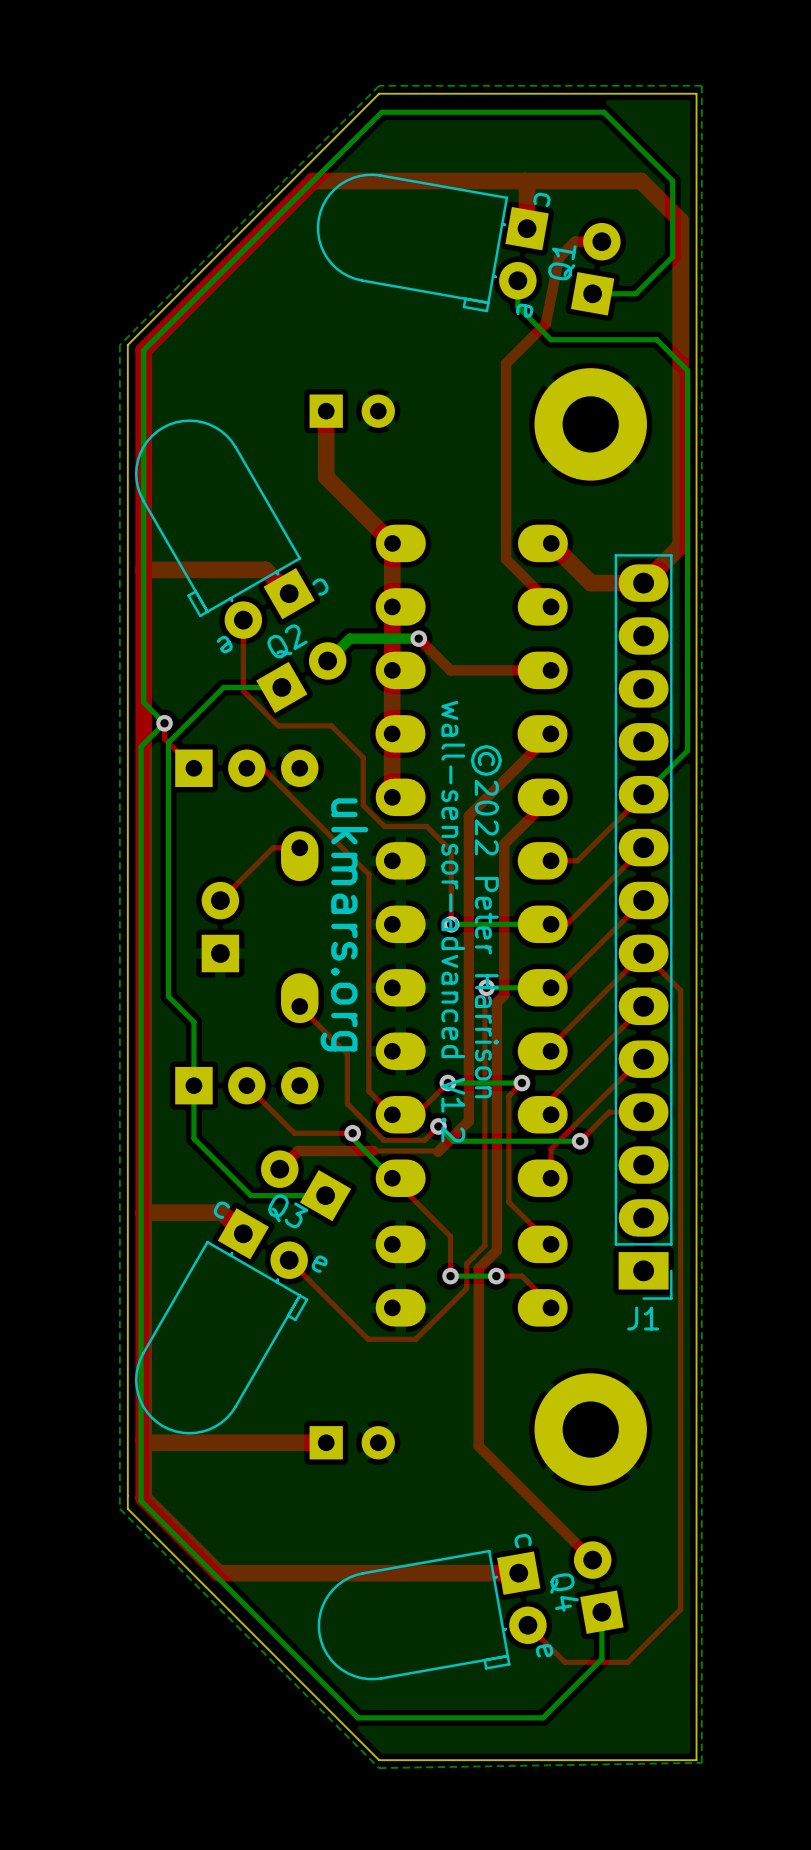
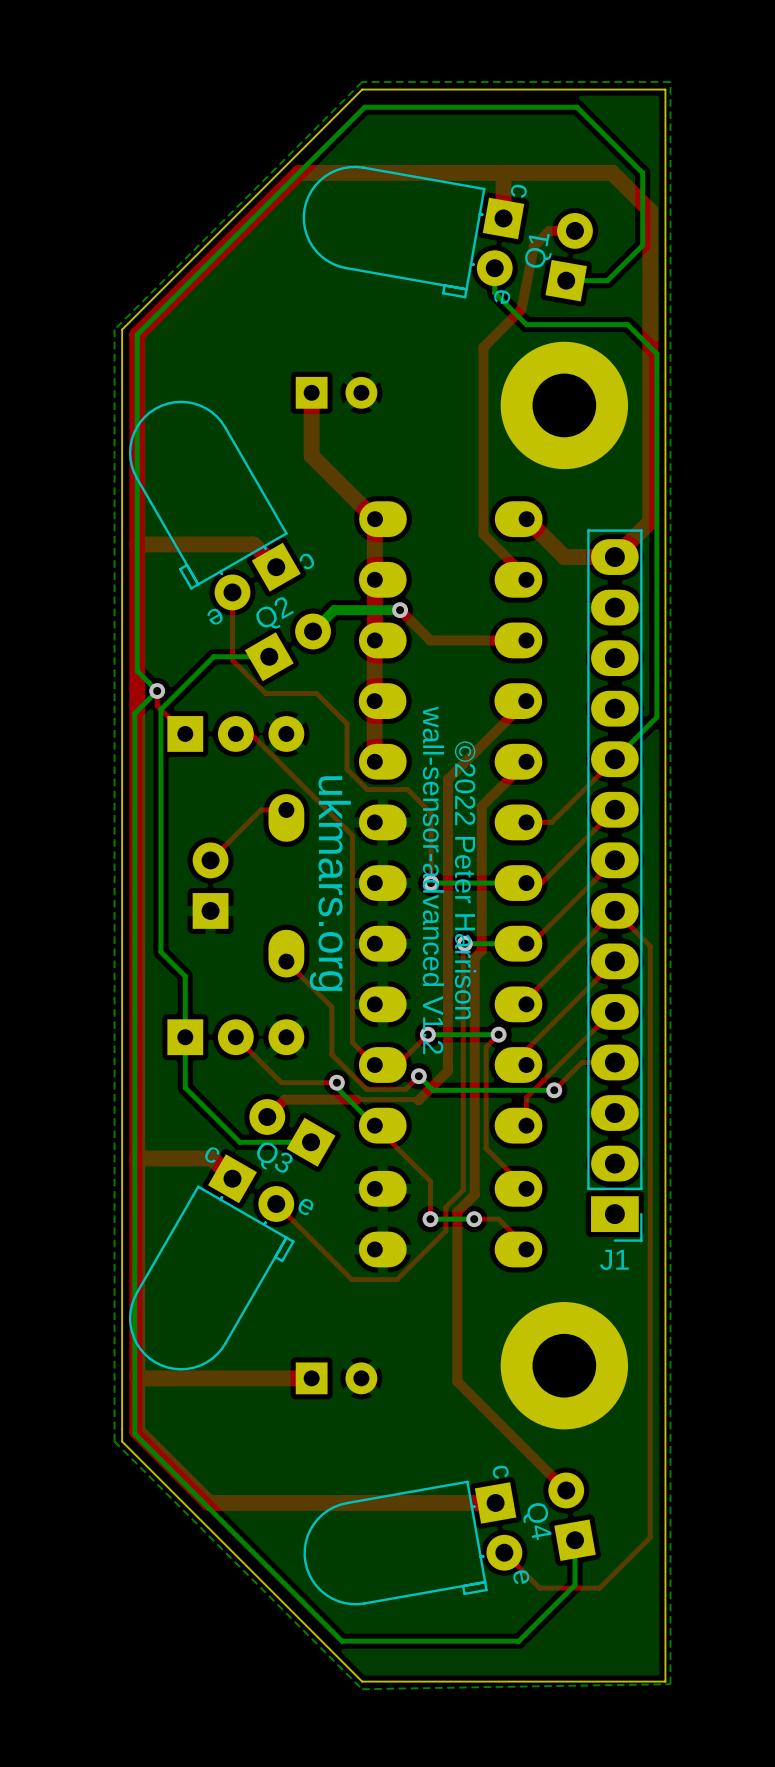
part footprint: [534, 368, 647, 481] -> [500, 341, 629, 470]
part footprint: [534, 1373, 647, 1486] -> [500, 1302, 629, 1430]

